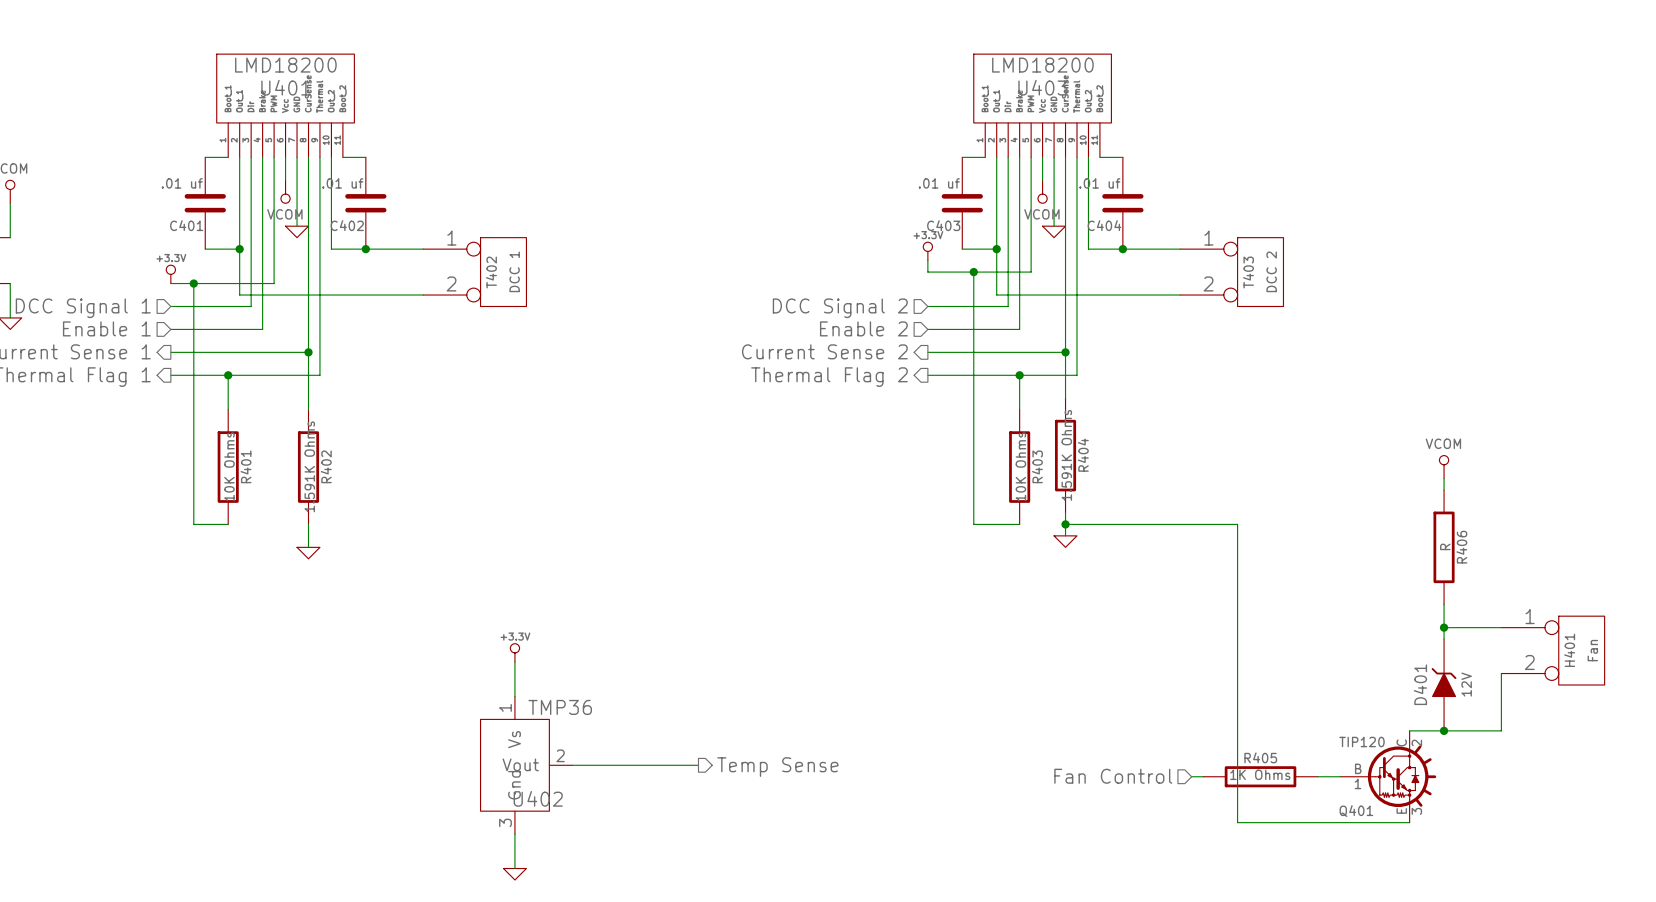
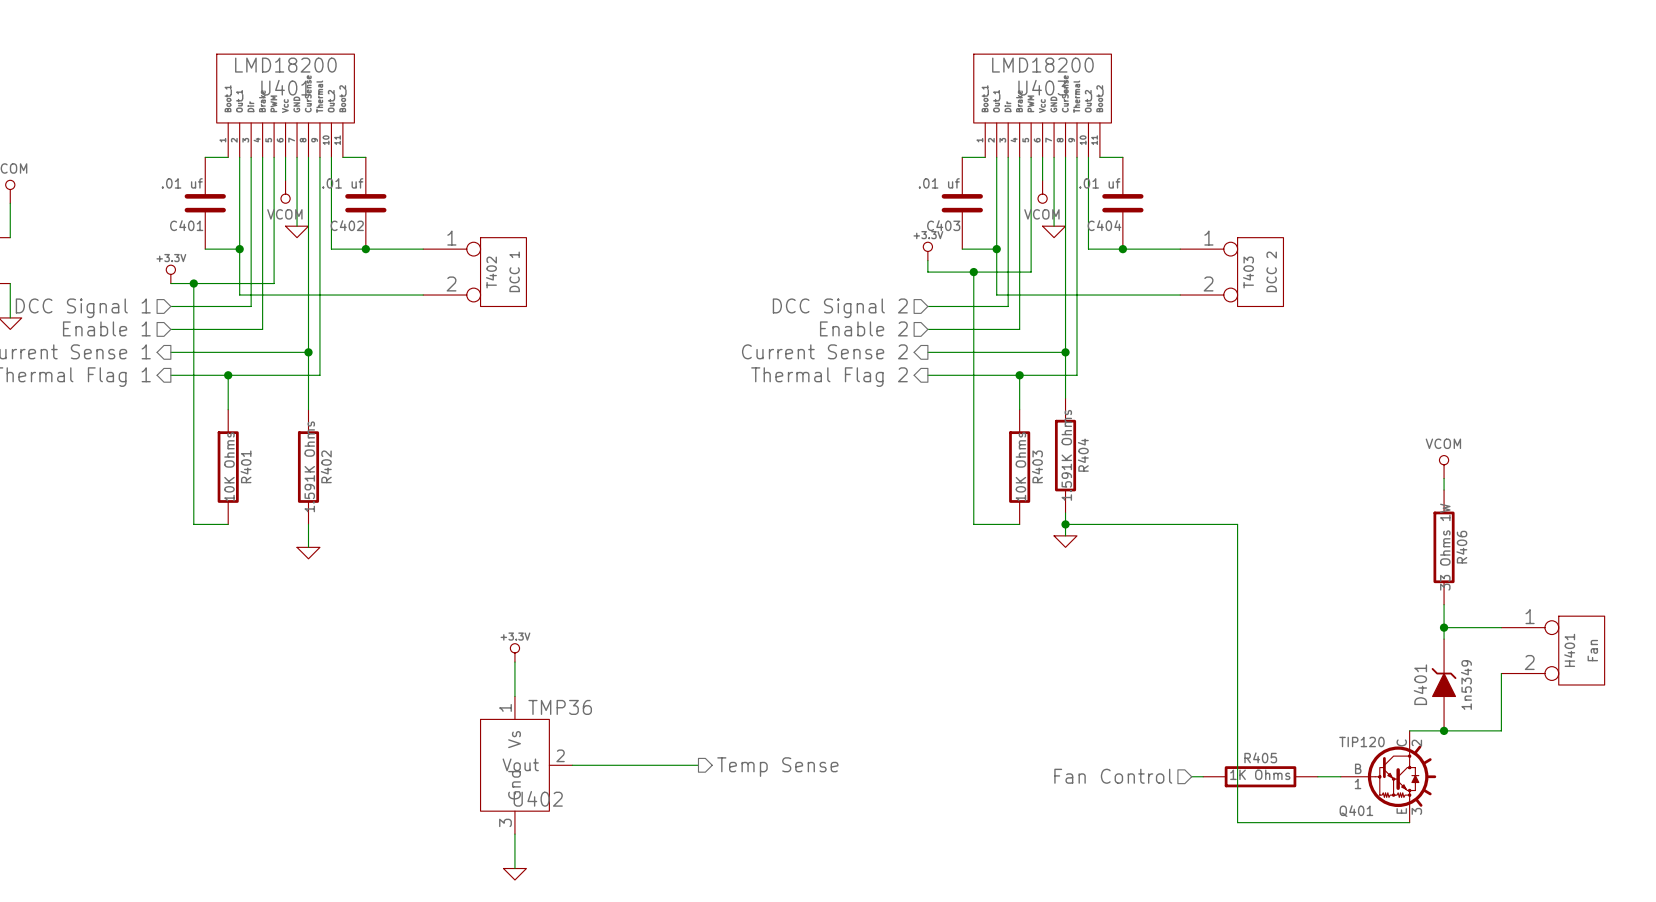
R406 value: R (1445, 546) -> 33 Ohms 1W (1445, 547)
D401 value: 12V (1466, 684) -> 1n5349 (1466, 685)

